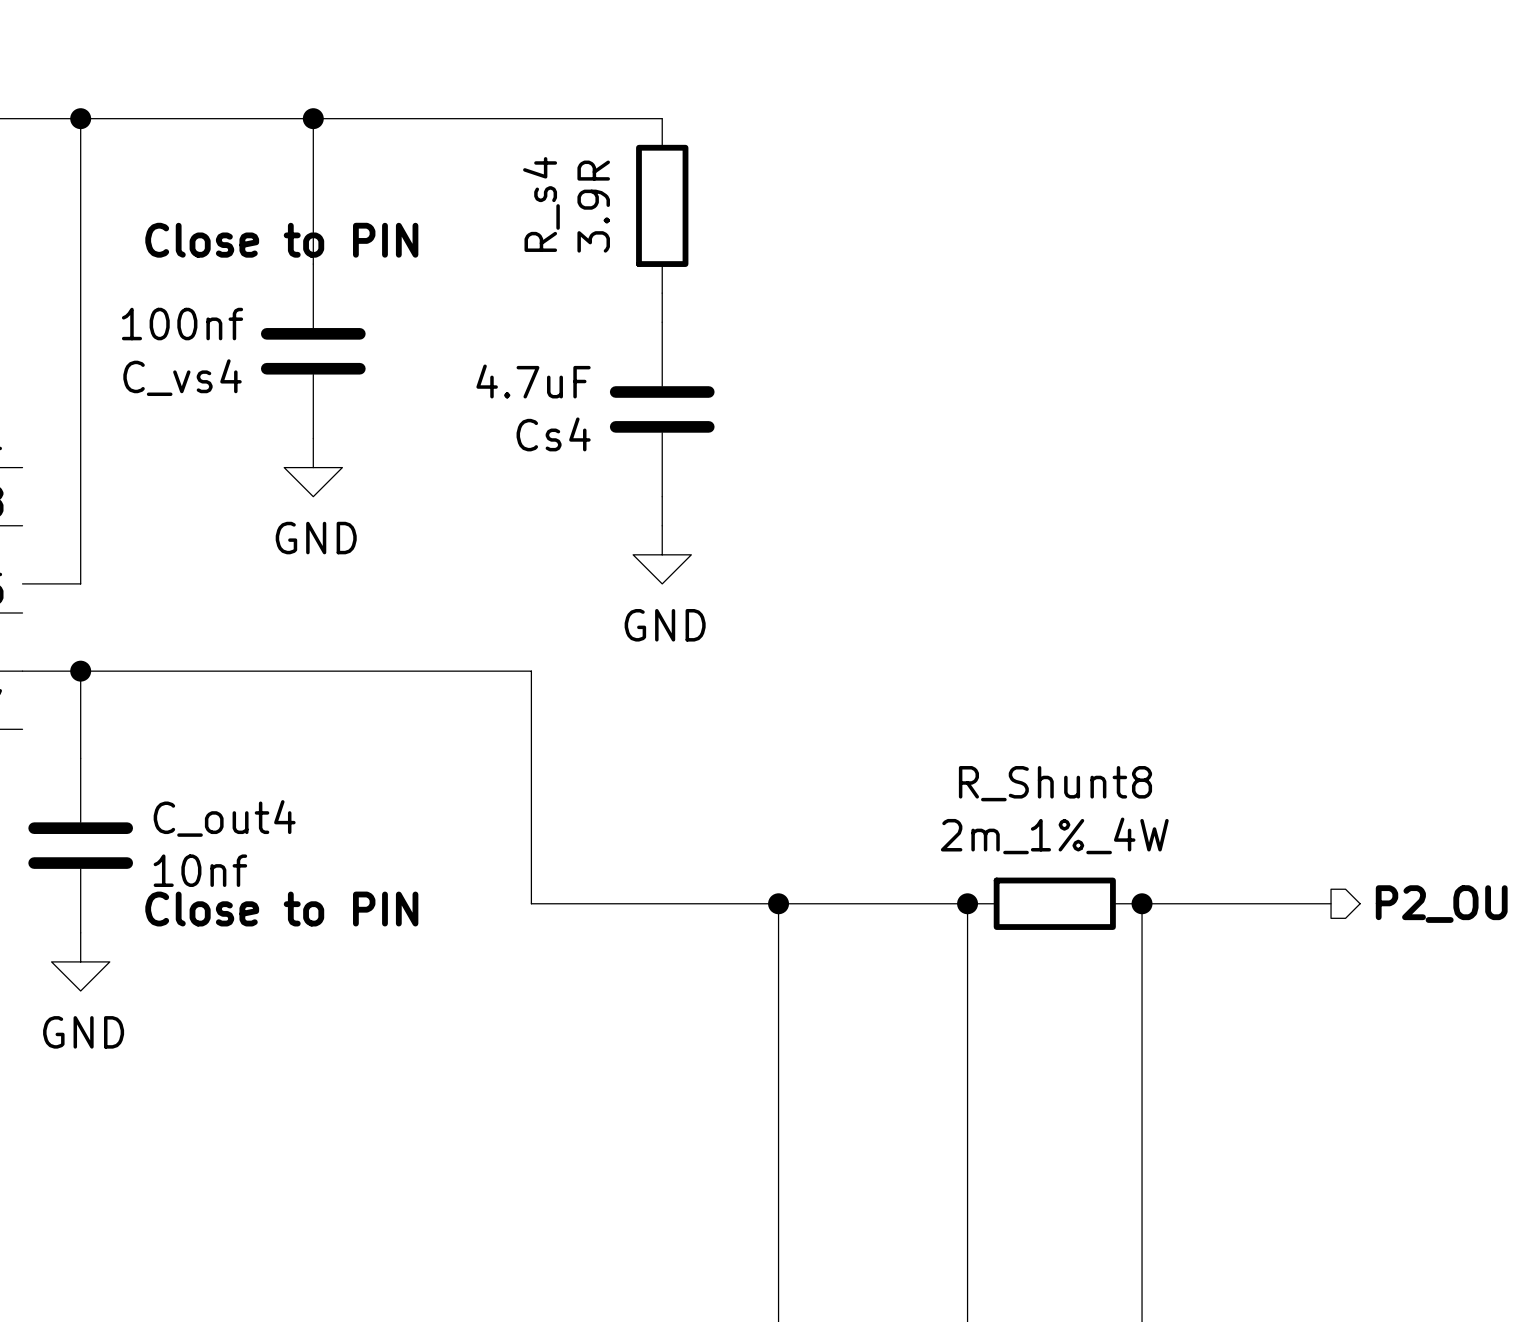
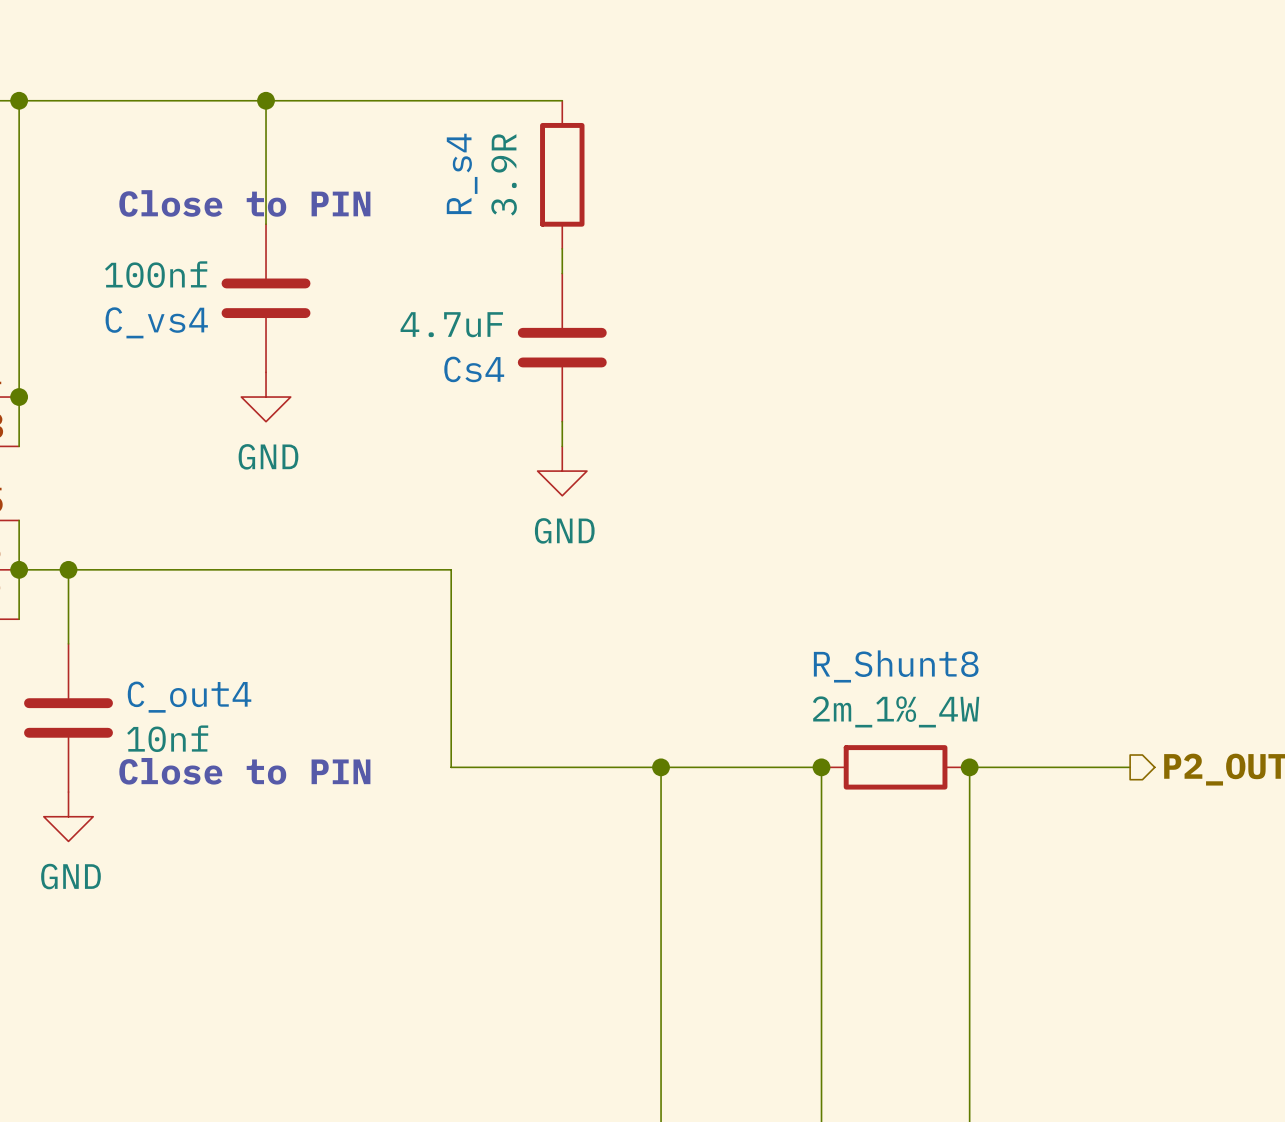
wire: none -> (19, 100) (19, 446)
wire: (80, 118) (80, 583) (22, 583) -> none
junction position: (80, 118) -> (19, 100)
junction: none -> (19, 397)
wire: none -> (19, 520) (19, 619)
junction: none -> (19, 569)

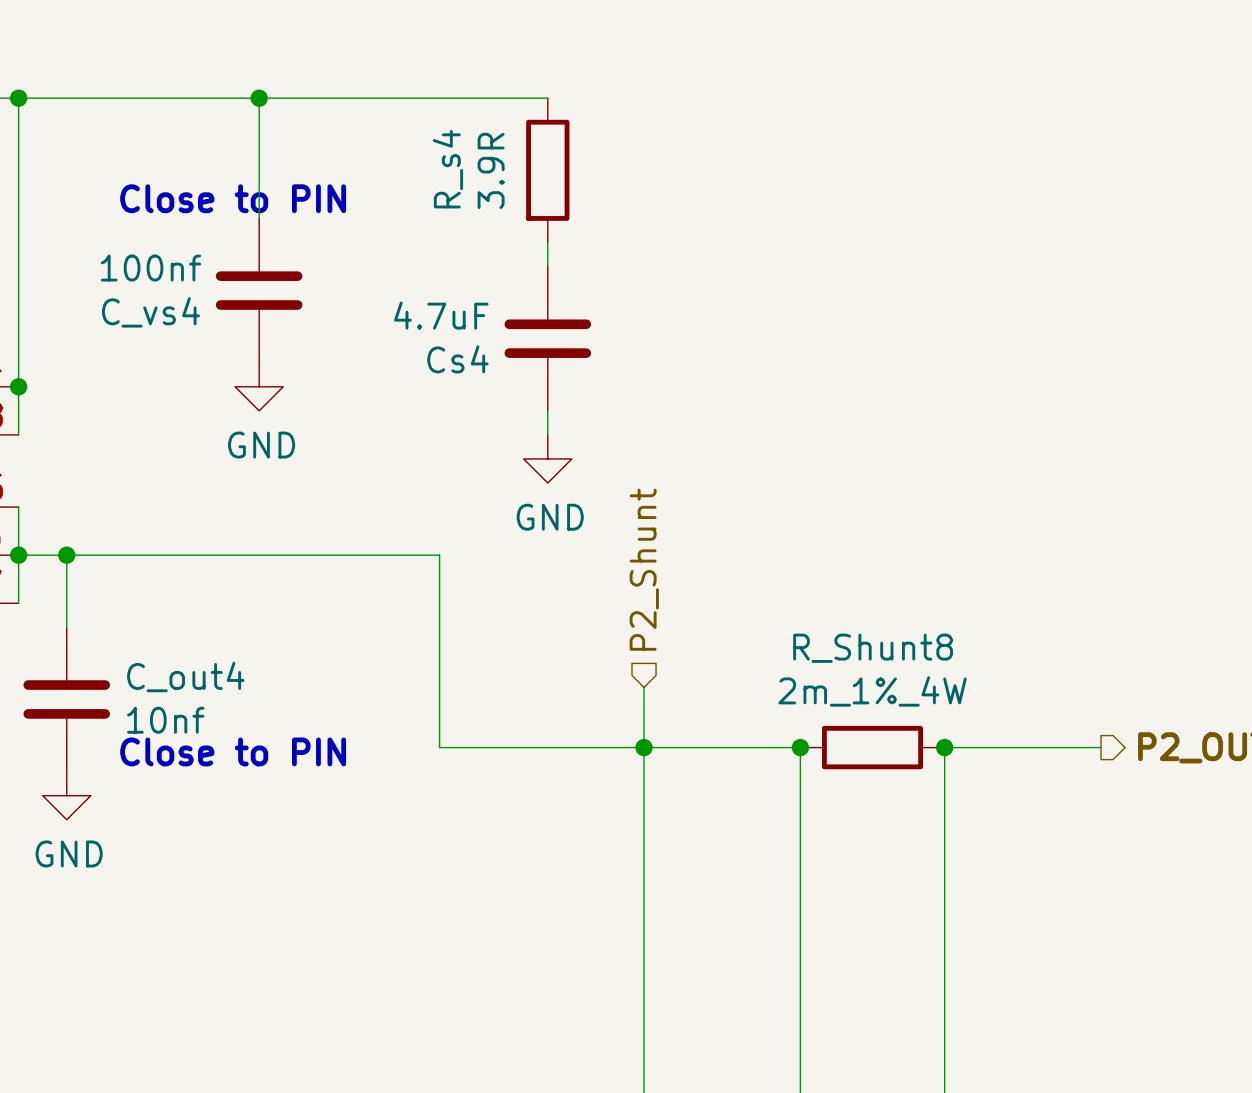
hierarchical label: none -> P2_Shunt (644, 569)
wire: none -> (644, 687) (644, 747)

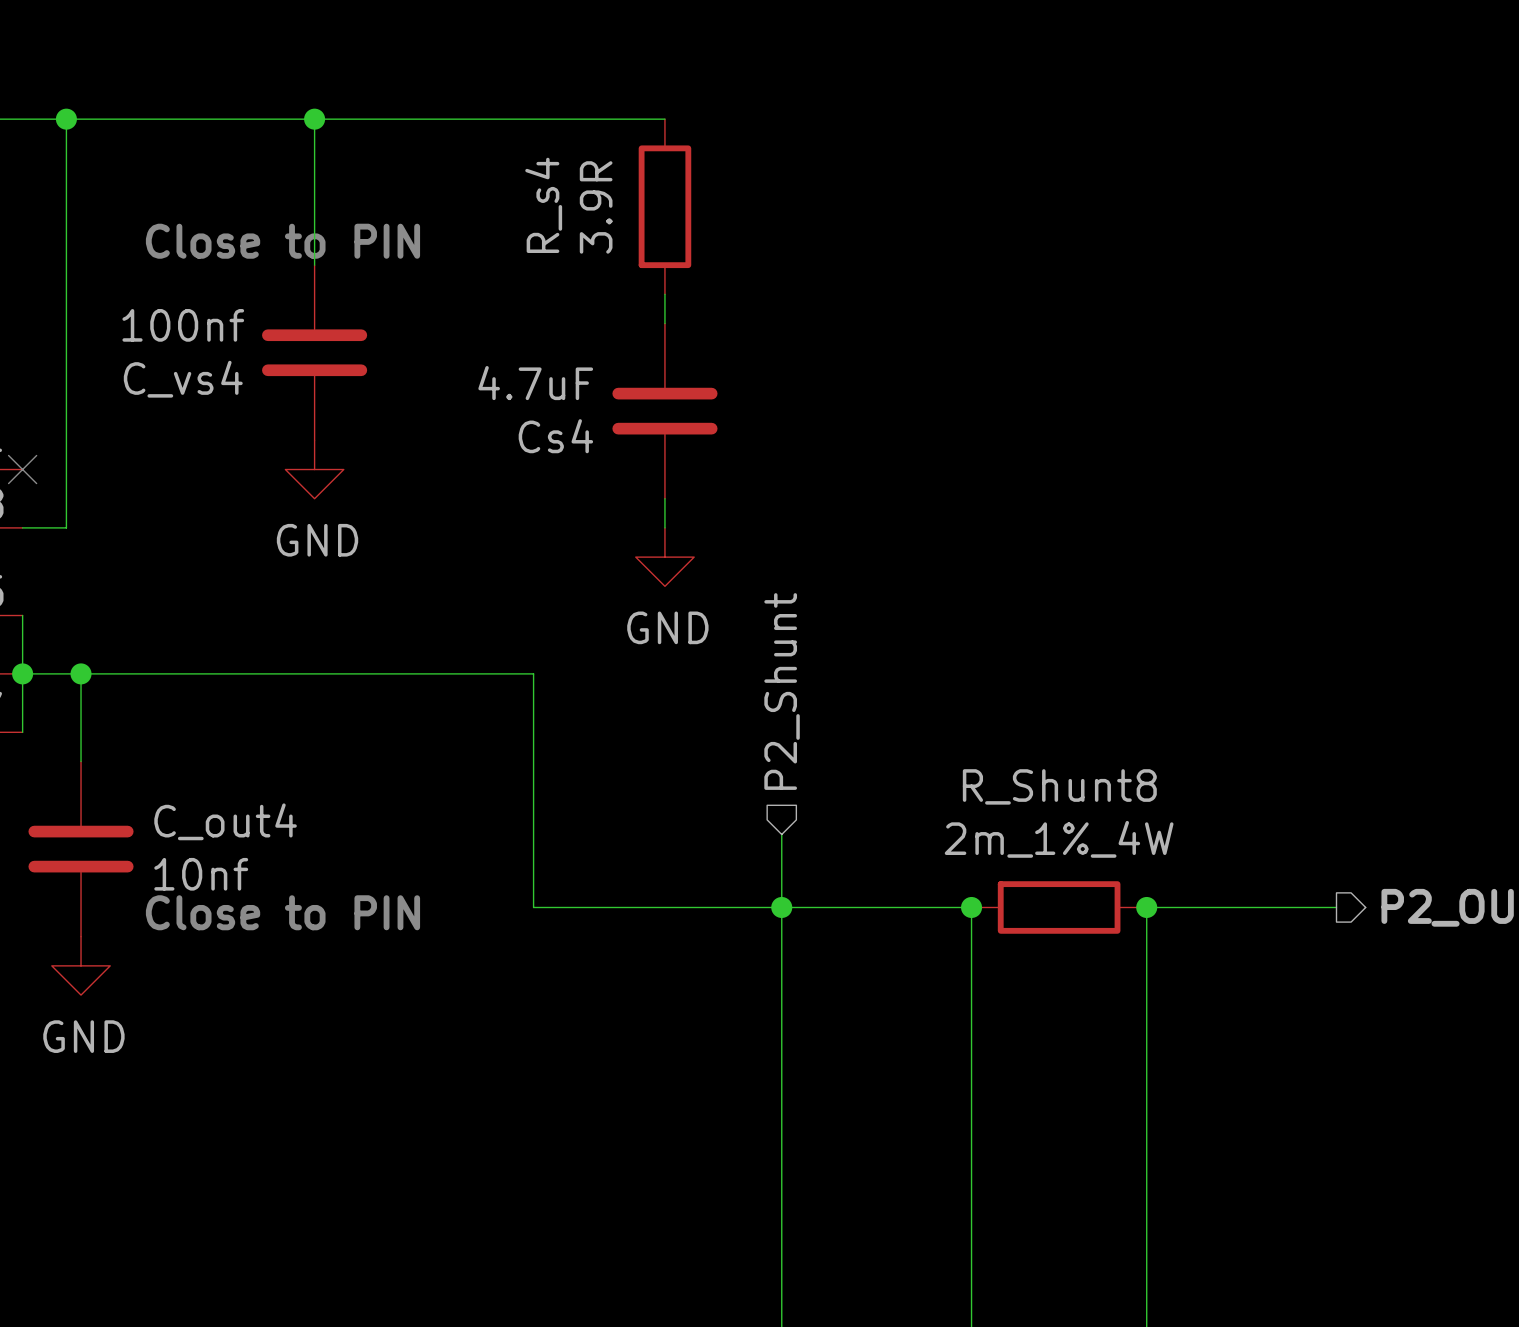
wire: (18, 98) (18, 434) -> (66, 119) (66, 527) (22, 527)
junction position: (18, 98) -> (66, 119)
junction: (18, 386) -> none
no-connect mark: none -> (22, 469)

